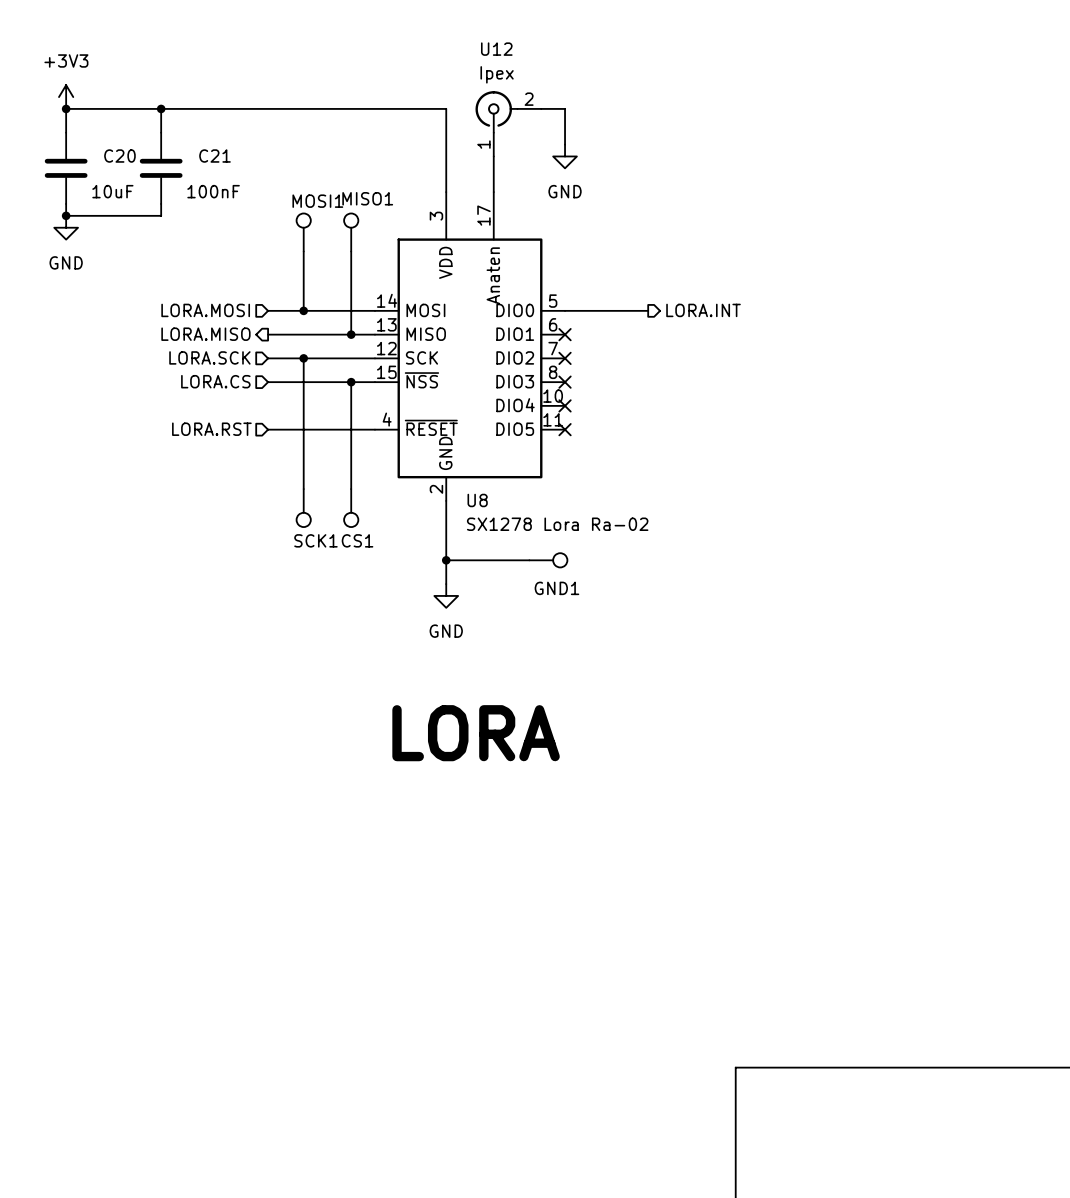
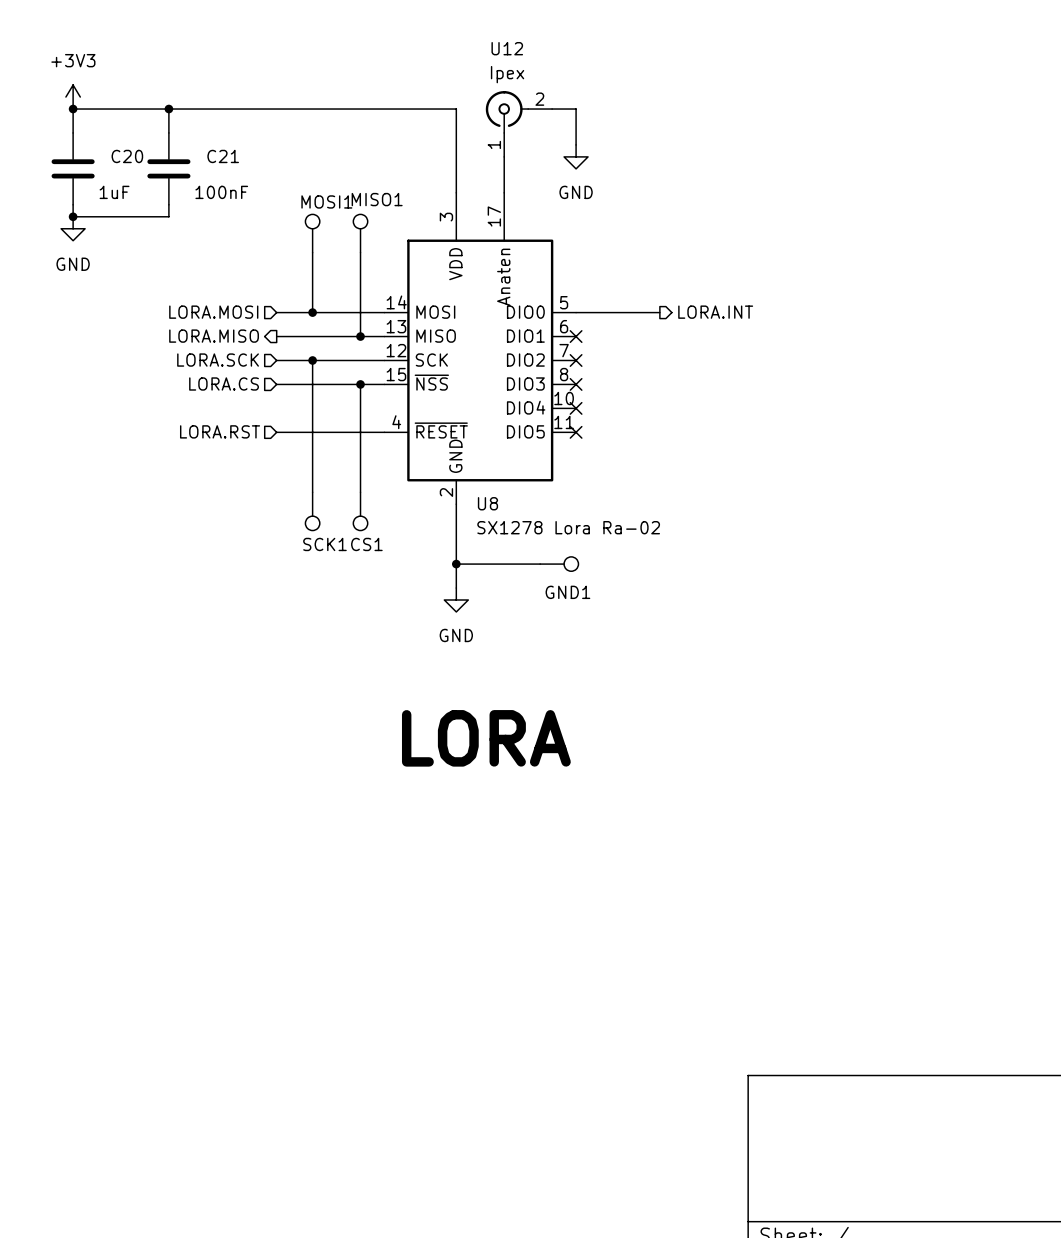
C20 value: 10uF (112, 191) -> 1uF (114, 192)

